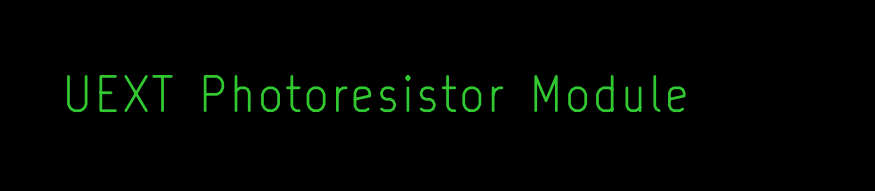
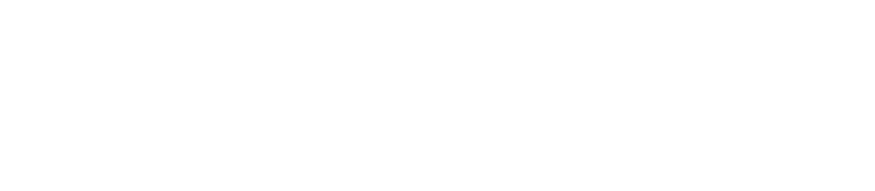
text: UEXT Photoresistor Module (376, 93) -> none

